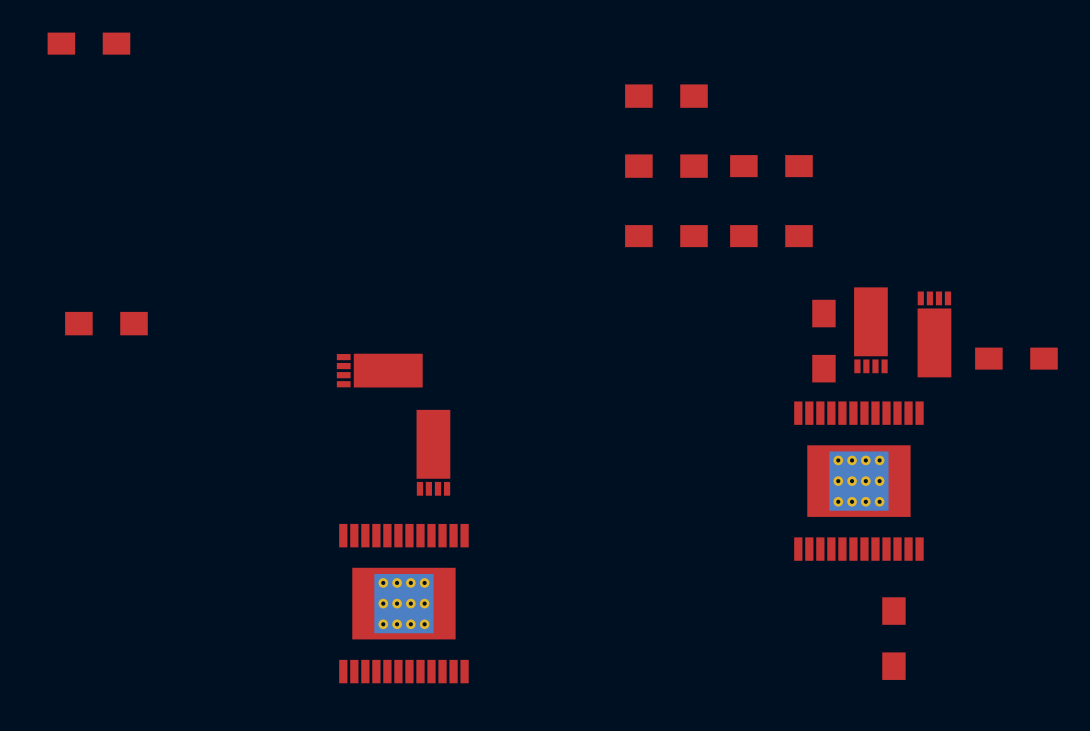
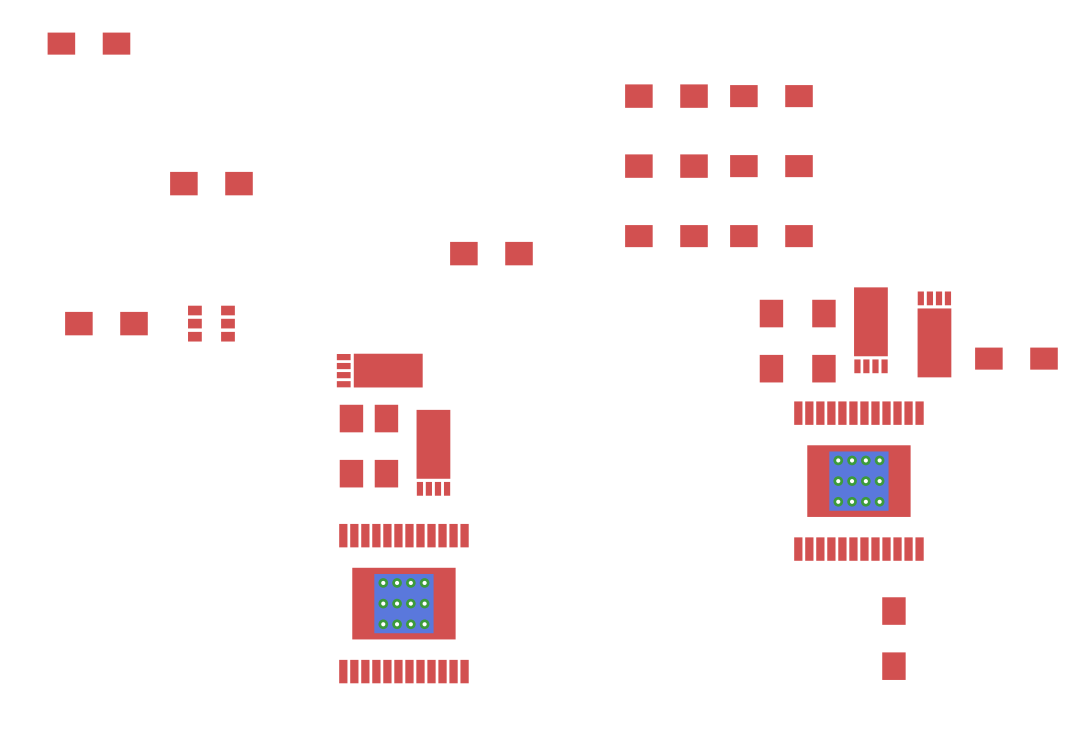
part: none -> (771, 96)
part: none -> (211, 183)
part: none -> (491, 253)
part: none -> (211, 323)
part: none -> (771, 341)
part: none -> (351, 446)
part: none -> (386, 446)

